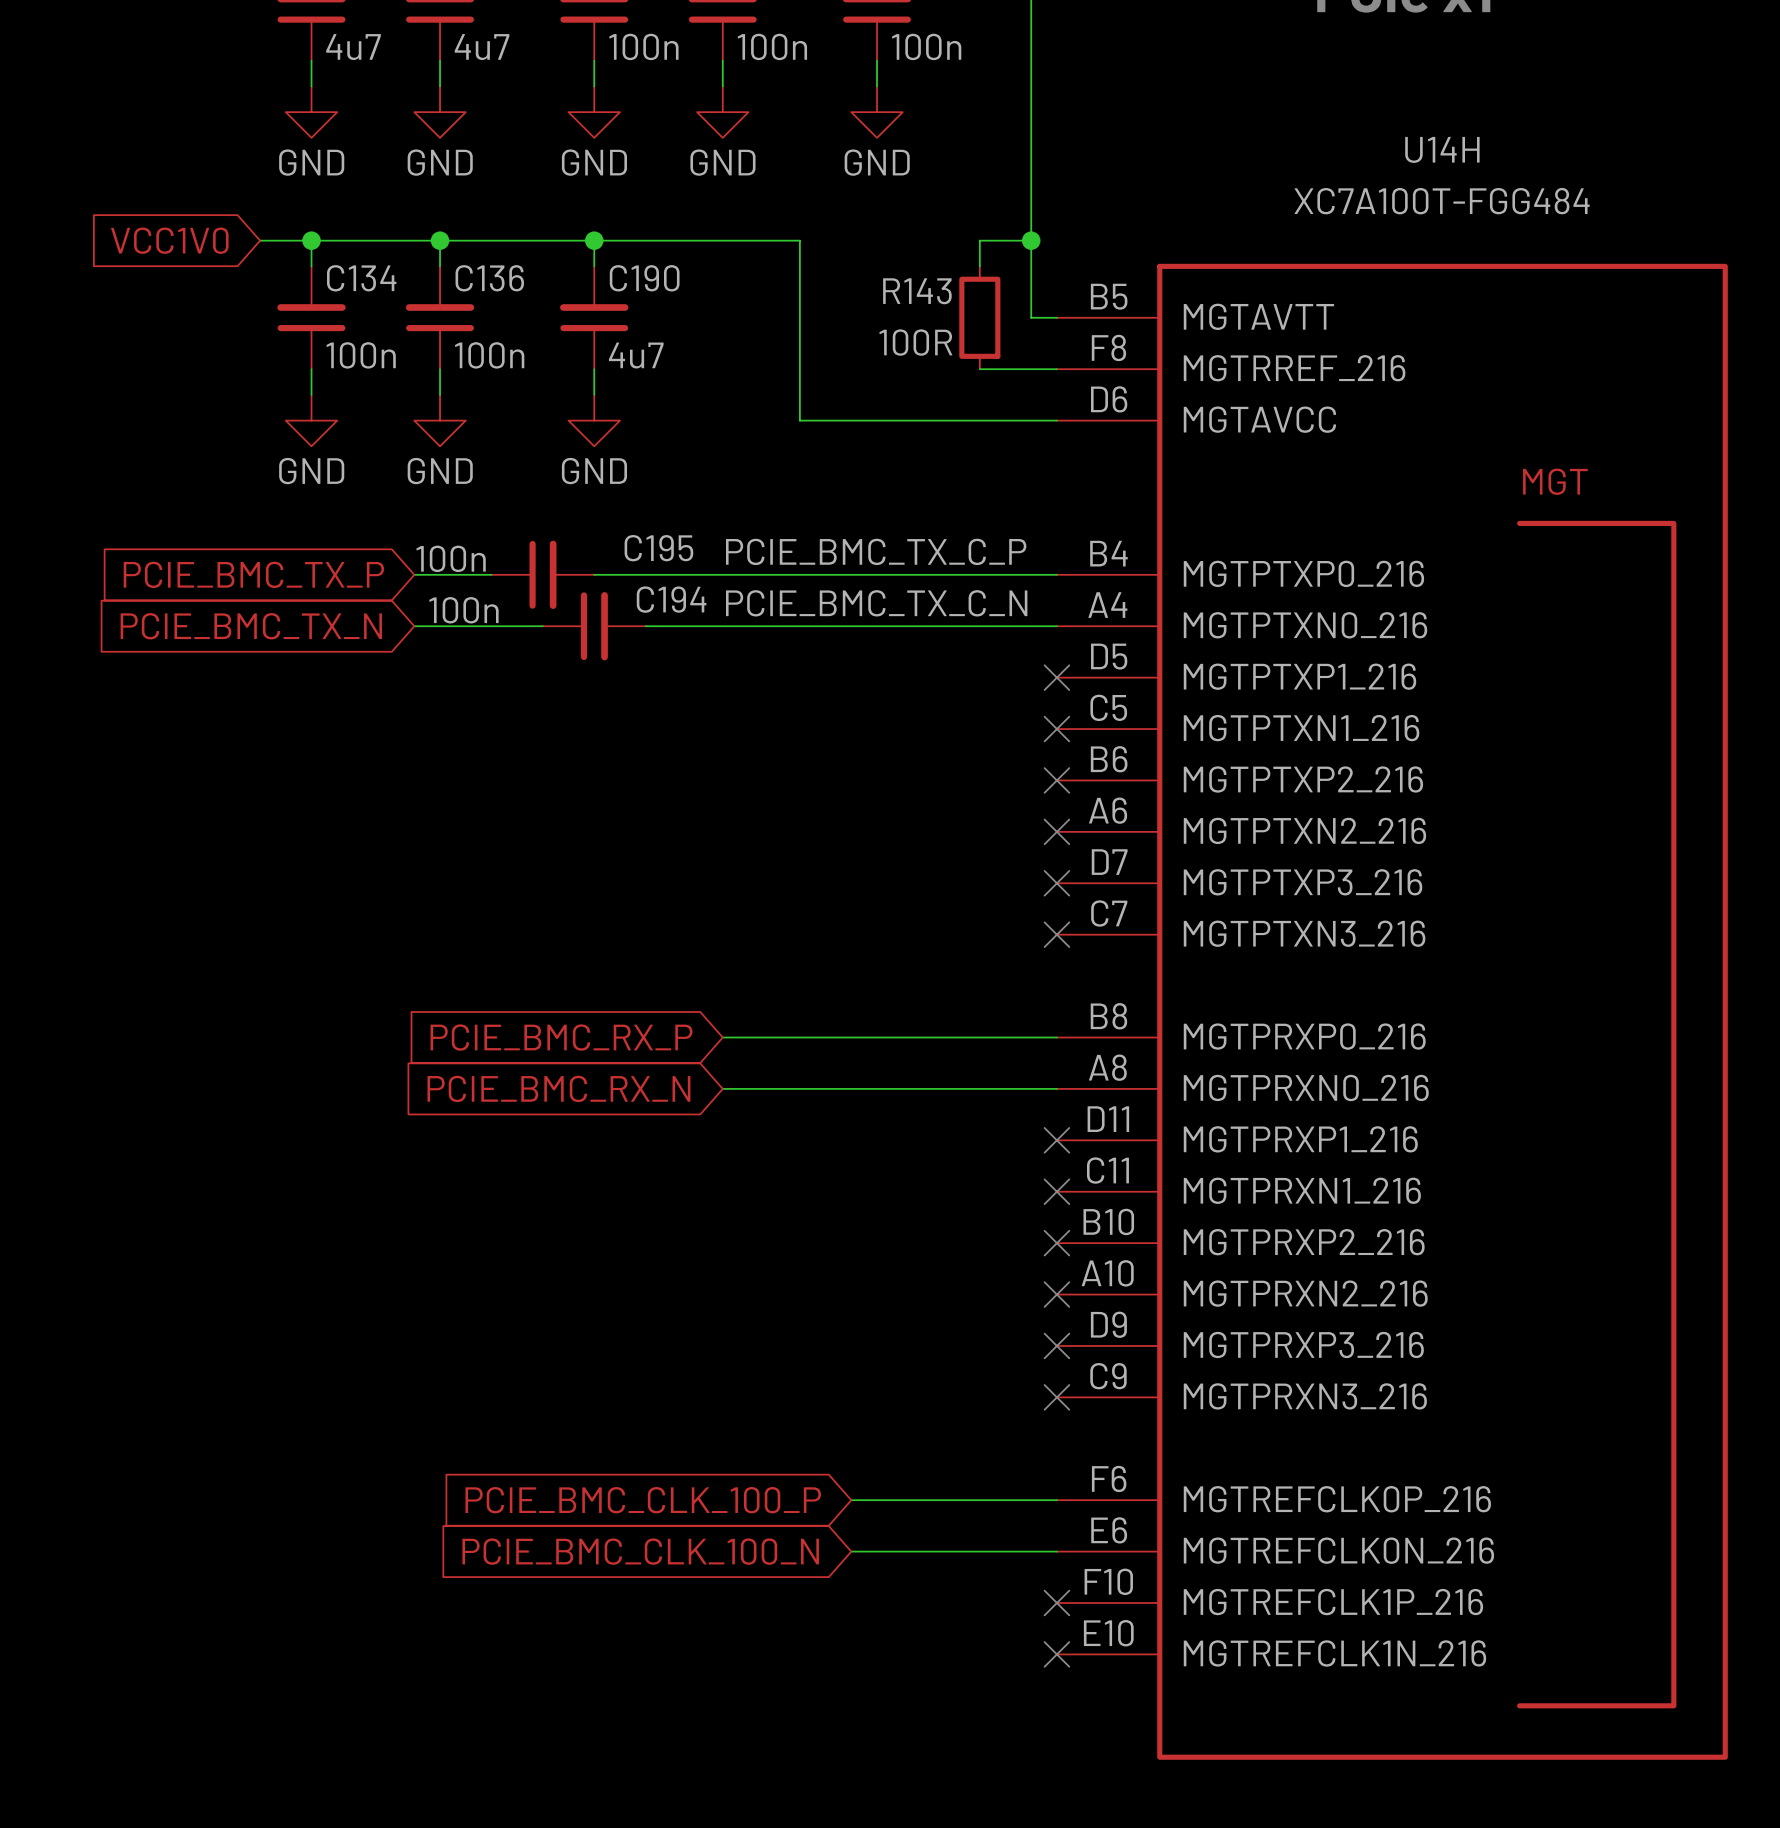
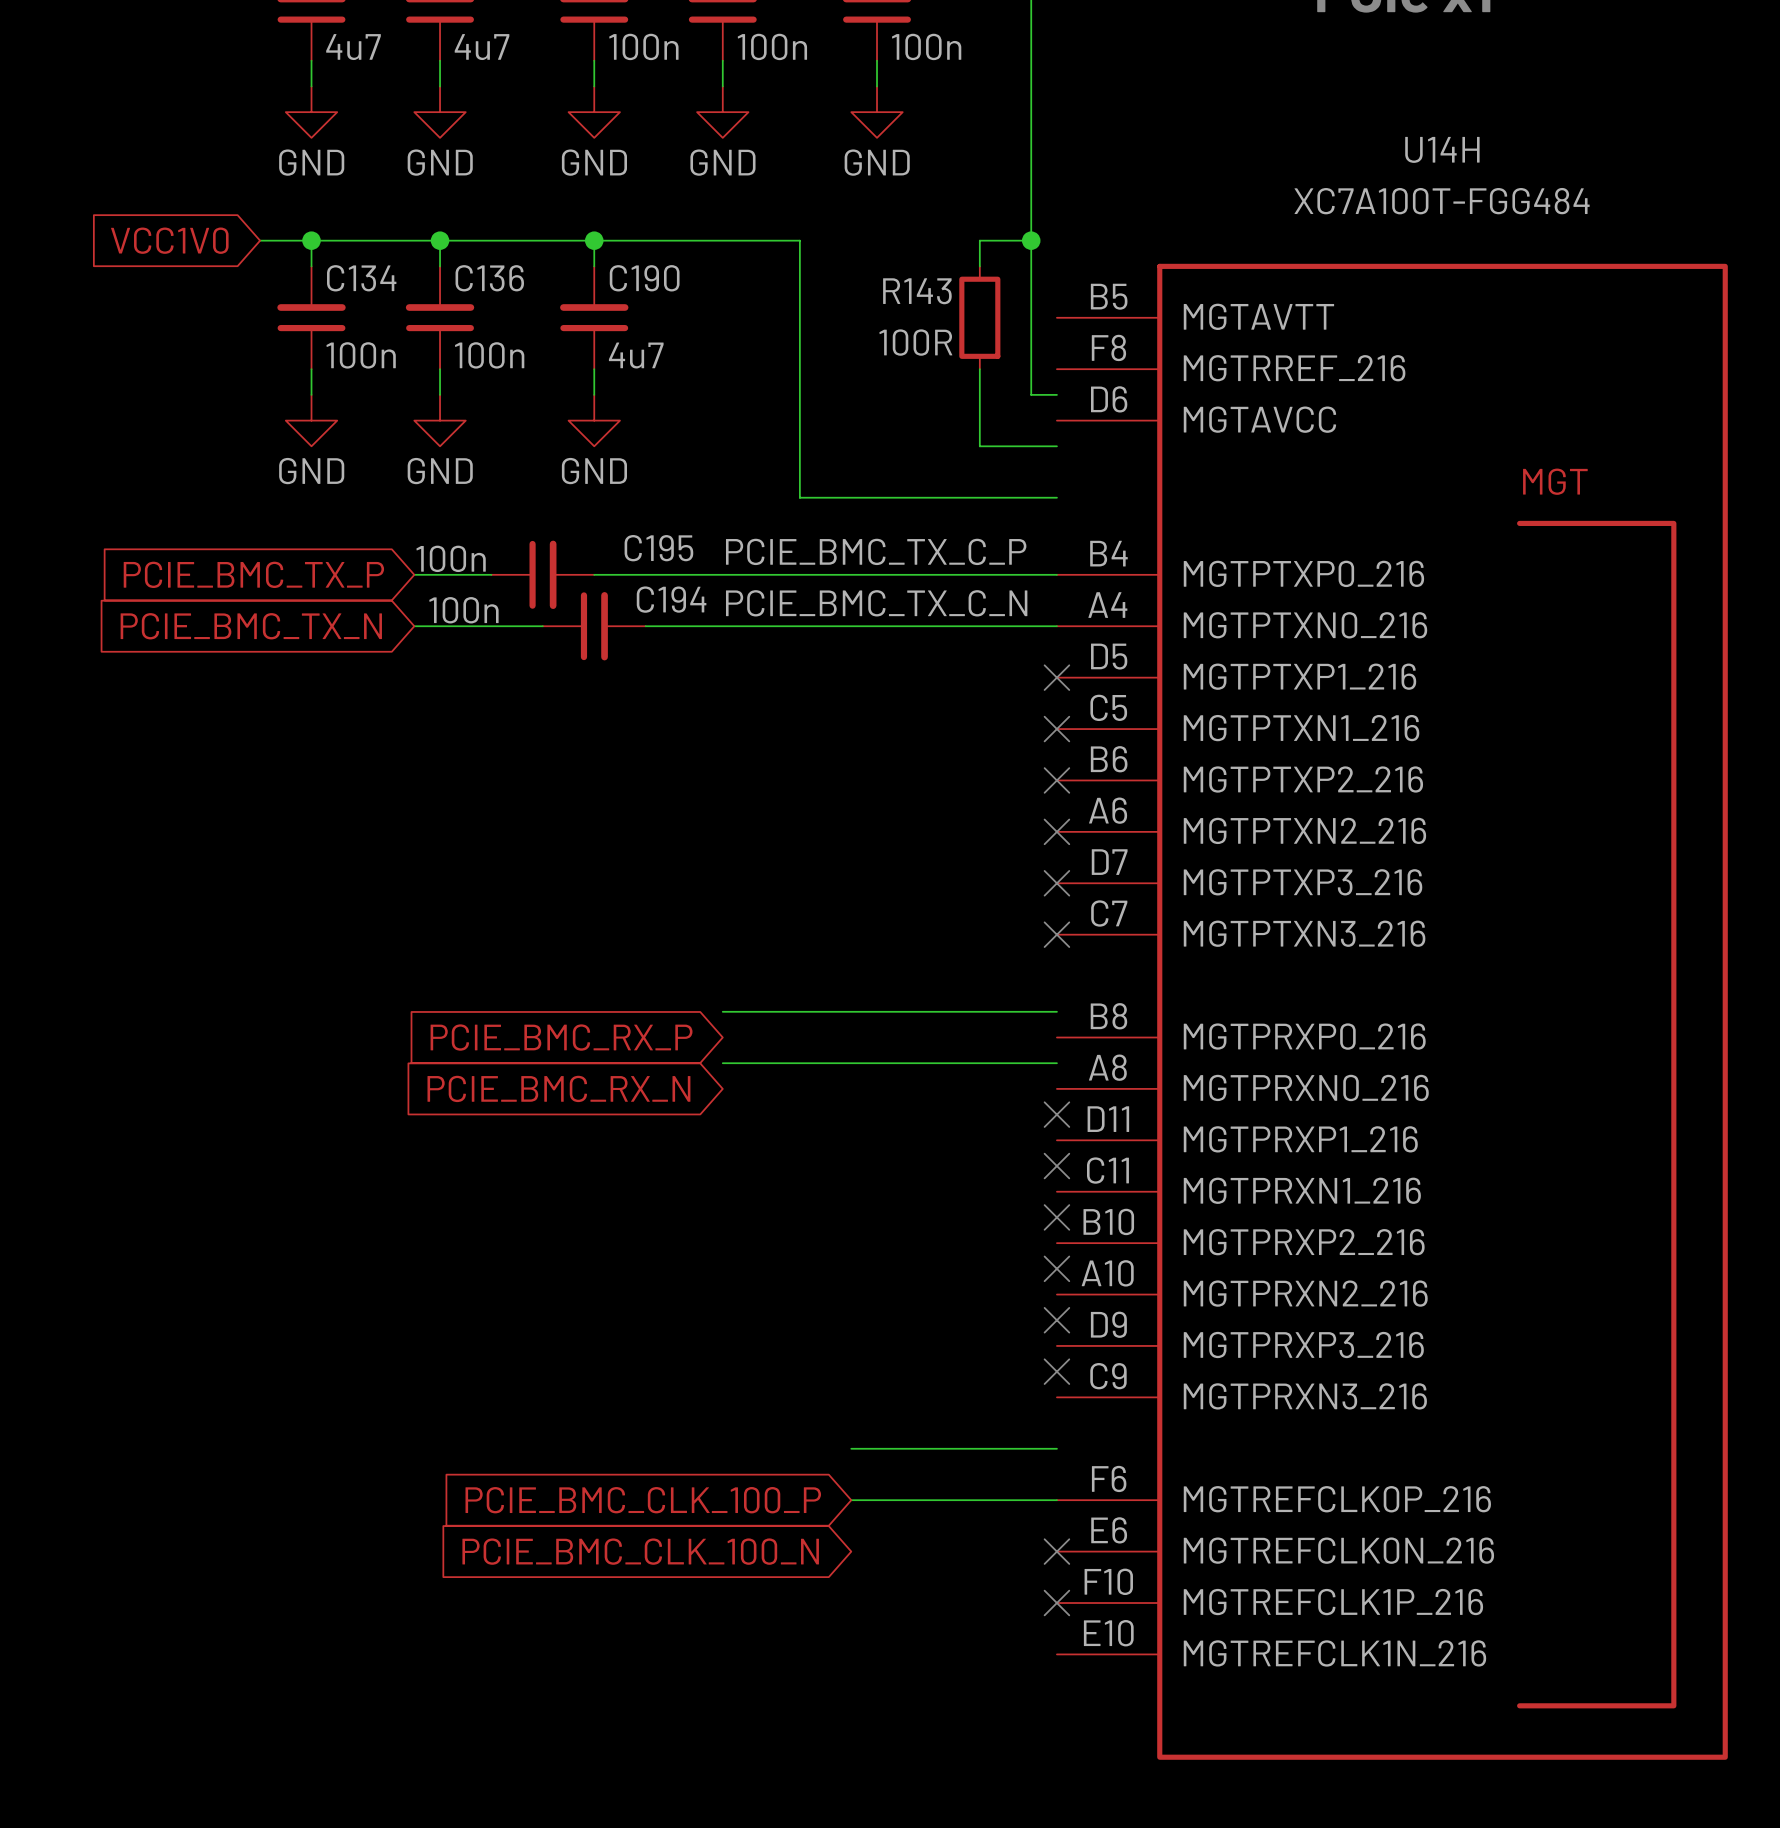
wire: (1031, 317) (1056, 317) -> (1031, 317) (1031, 394) (1056, 394)
wire: (979, 369) (1056, 369) -> (979, 369) (979, 446) (1056, 446)
wire: (799, 420) (1056, 420) -> (799, 420) (799, 497) (1056, 497)
wire: (722, 1037) (1056, 1037) -> (722, 1011) (1056, 1011)
wire: (722, 1088) (1056, 1088) -> (722, 1063) (1056, 1063)
no-connect mark: none -> (1056, 1114)
no-connect mark: (1056, 1140) -> none
no-connect mark: none -> (1056, 1166)
no-connect mark: (1056, 1191) -> none
no-connect mark: none -> (1056, 1217)
no-connect mark: (1056, 1243) -> none
no-connect mark: none -> (1056, 1268)
no-connect mark: (1056, 1294) -> none
no-connect mark: none -> (1056, 1320)
no-connect mark: (1056, 1345) -> none
no-connect mark: none -> (1056, 1371)
no-connect mark: (1056, 1397) -> none
wire: (851, 1551) (1056, 1551) -> (851, 1448) (1056, 1448)
no-connect mark: none -> (1056, 1551)
no-connect mark: (1056, 1654) -> none

